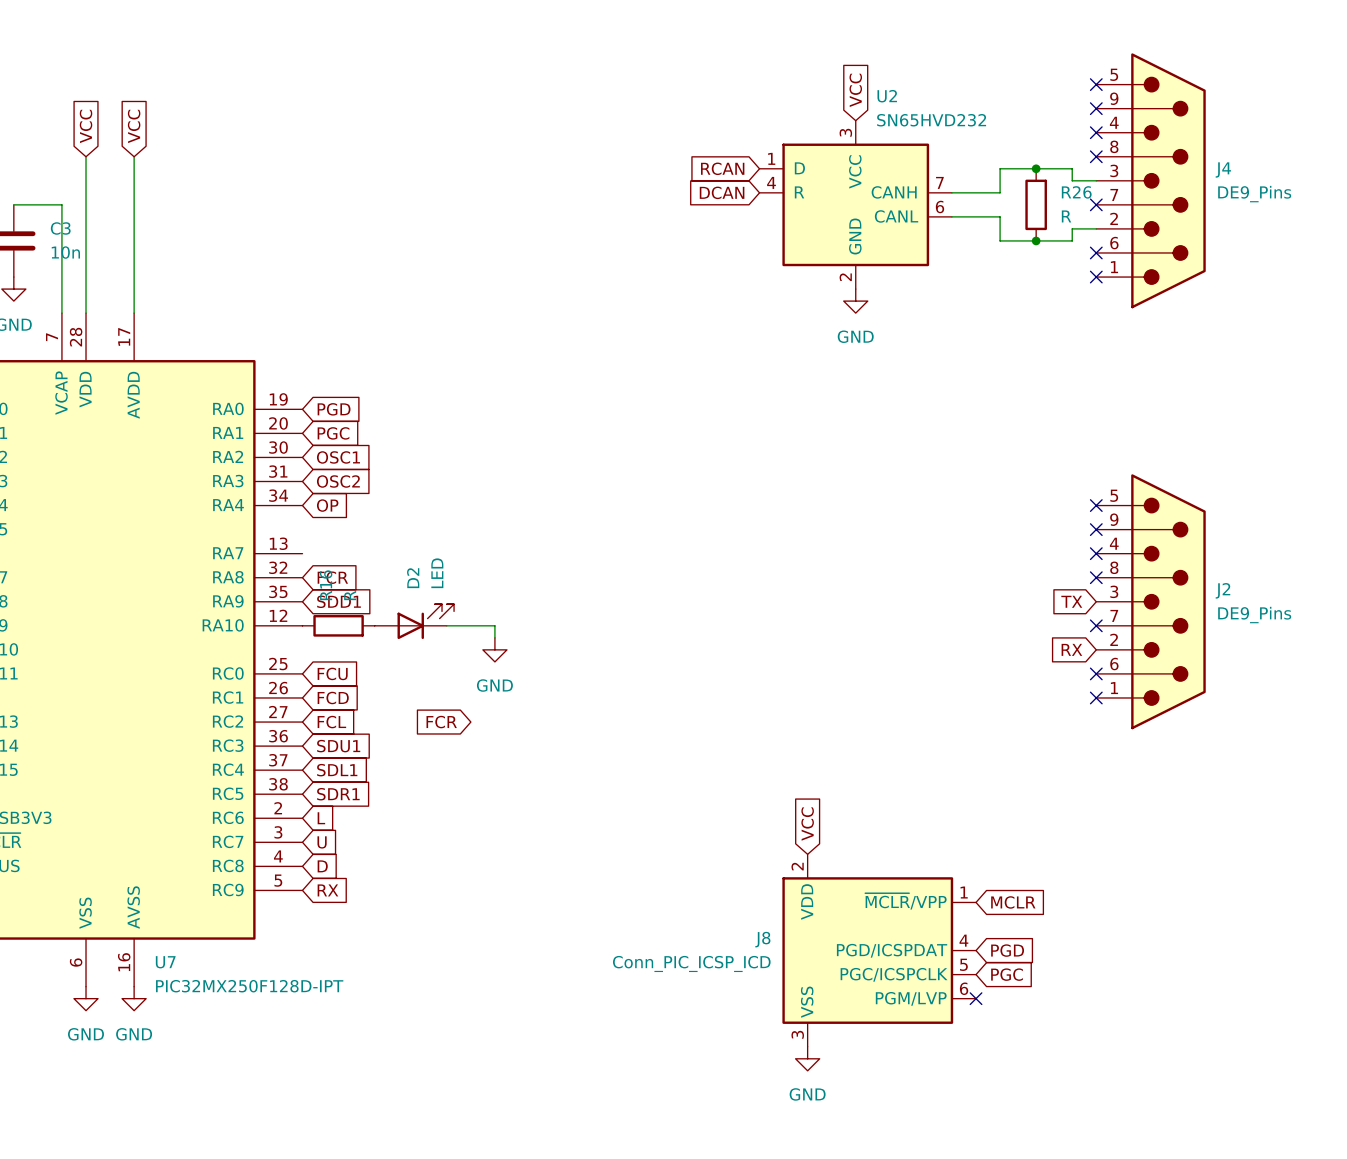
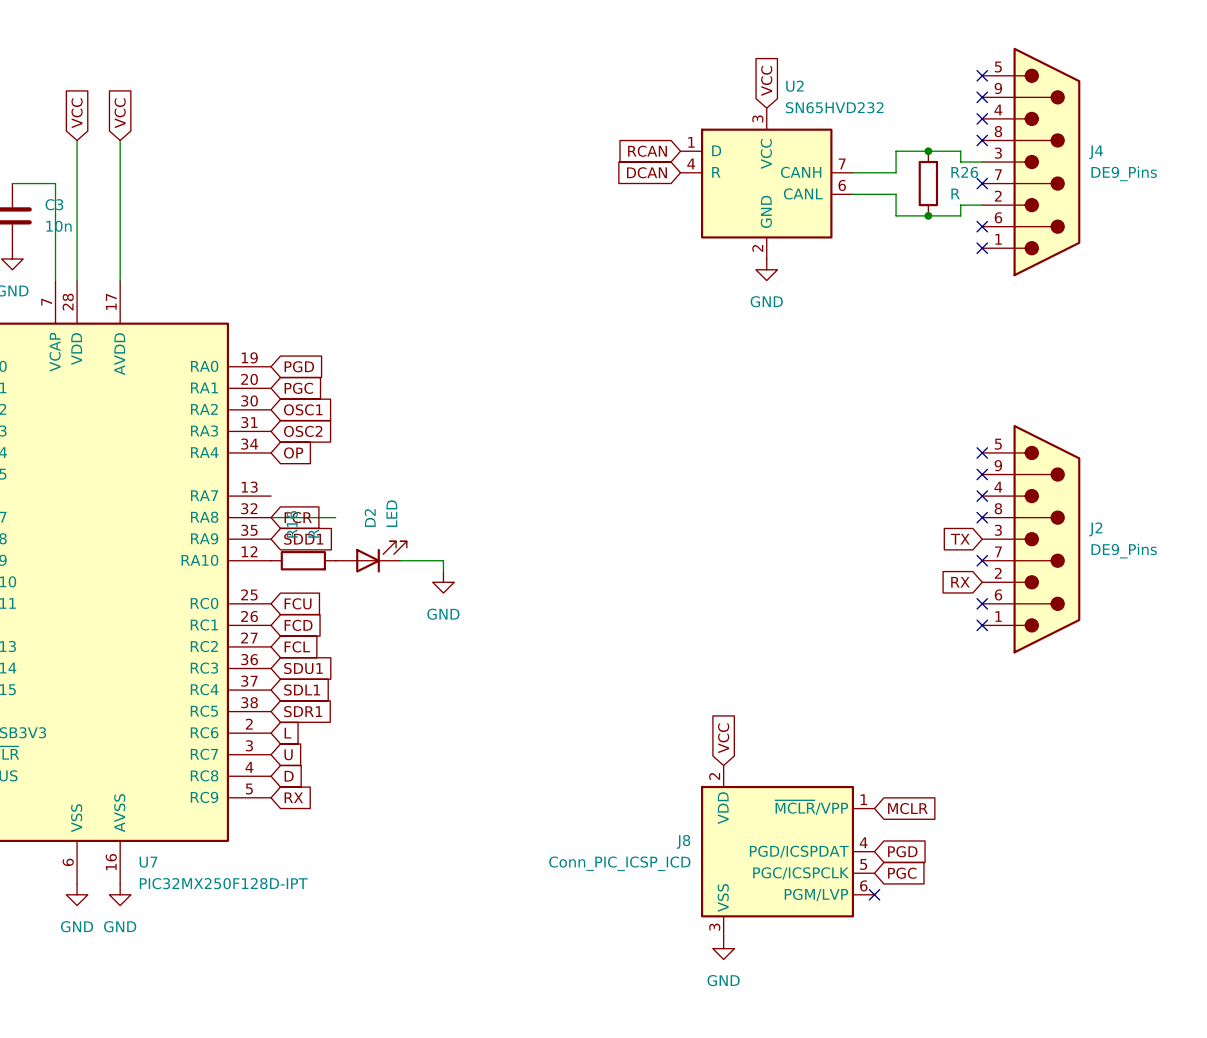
wire: none -> (271, 517) (335, 517)
global label: FCR (441, 722) -> none

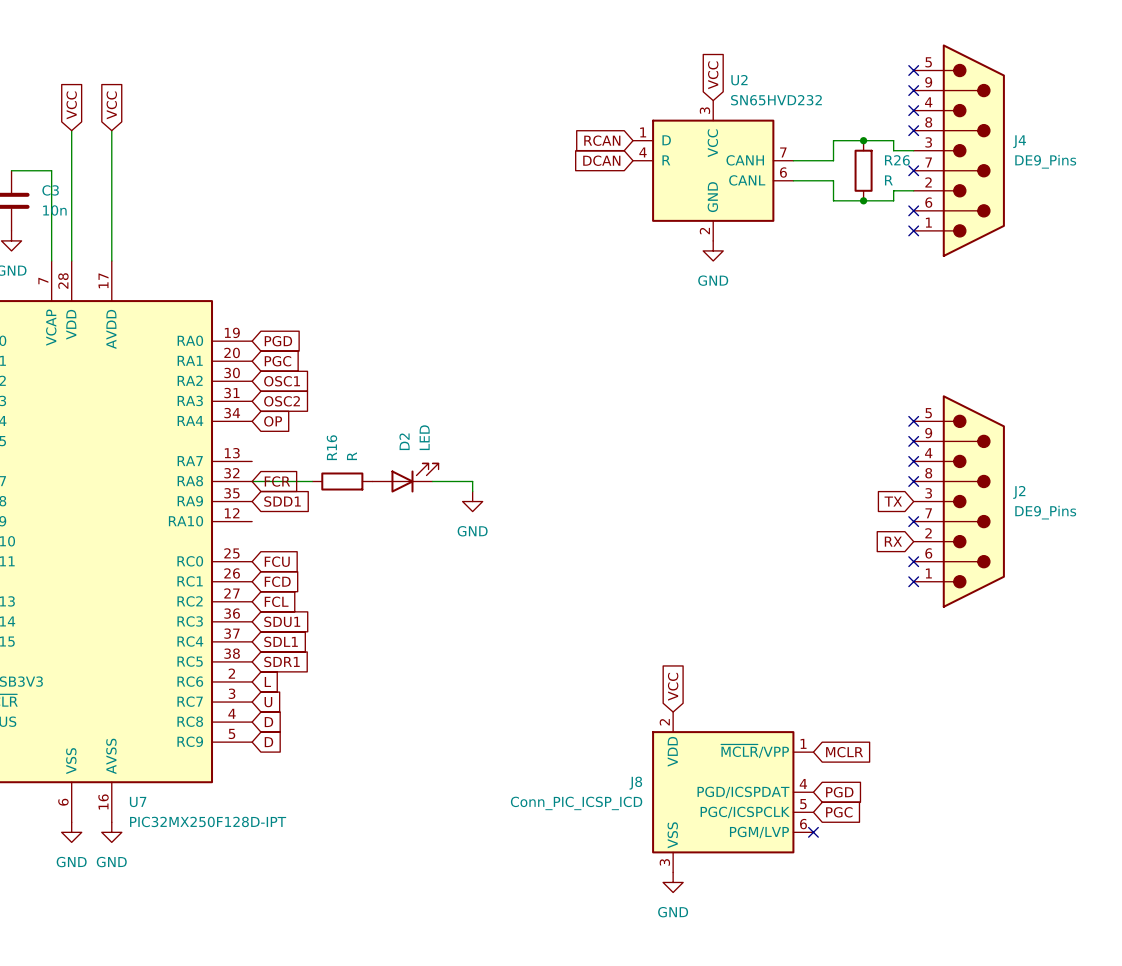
D2 position: (371, 556) -> (405, 477)
R16 position: (303, 560) -> (342, 481)
wire: (400, 560) (443, 560) (443, 571) -> (432, 481) (472, 481) (472, 491)
power symbol position: GND (443, 582) -> GND (472, 501)
global label: RX (293, 797) -> D (268, 742)

